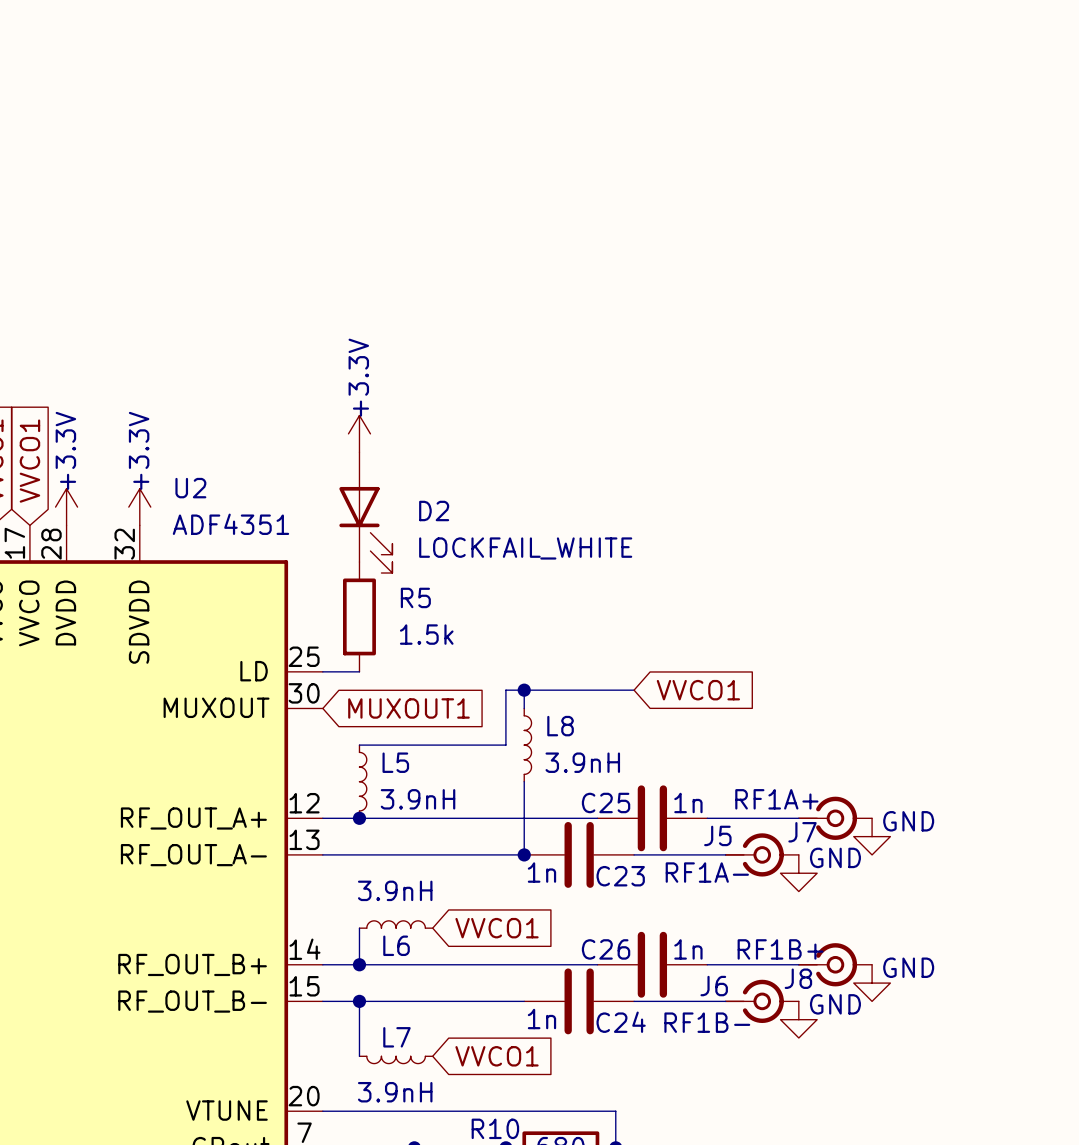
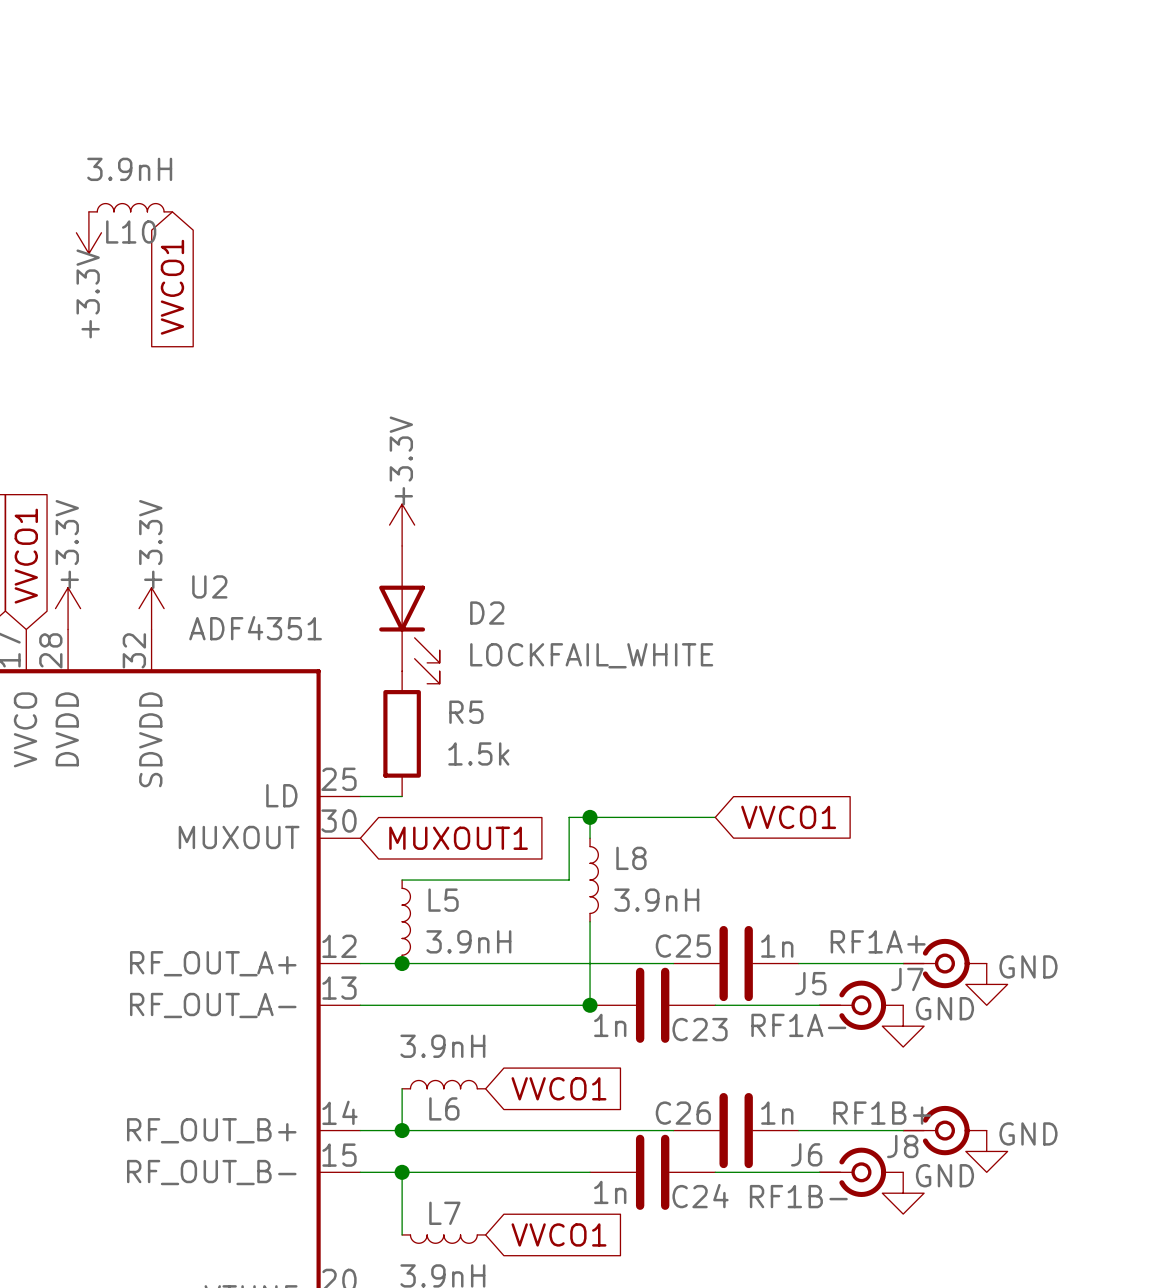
L10: none -> 3.9nH (130, 207)
power symbol: none -> +3.3V (88, 232)
global label: none -> VVCO1 (172, 287)

